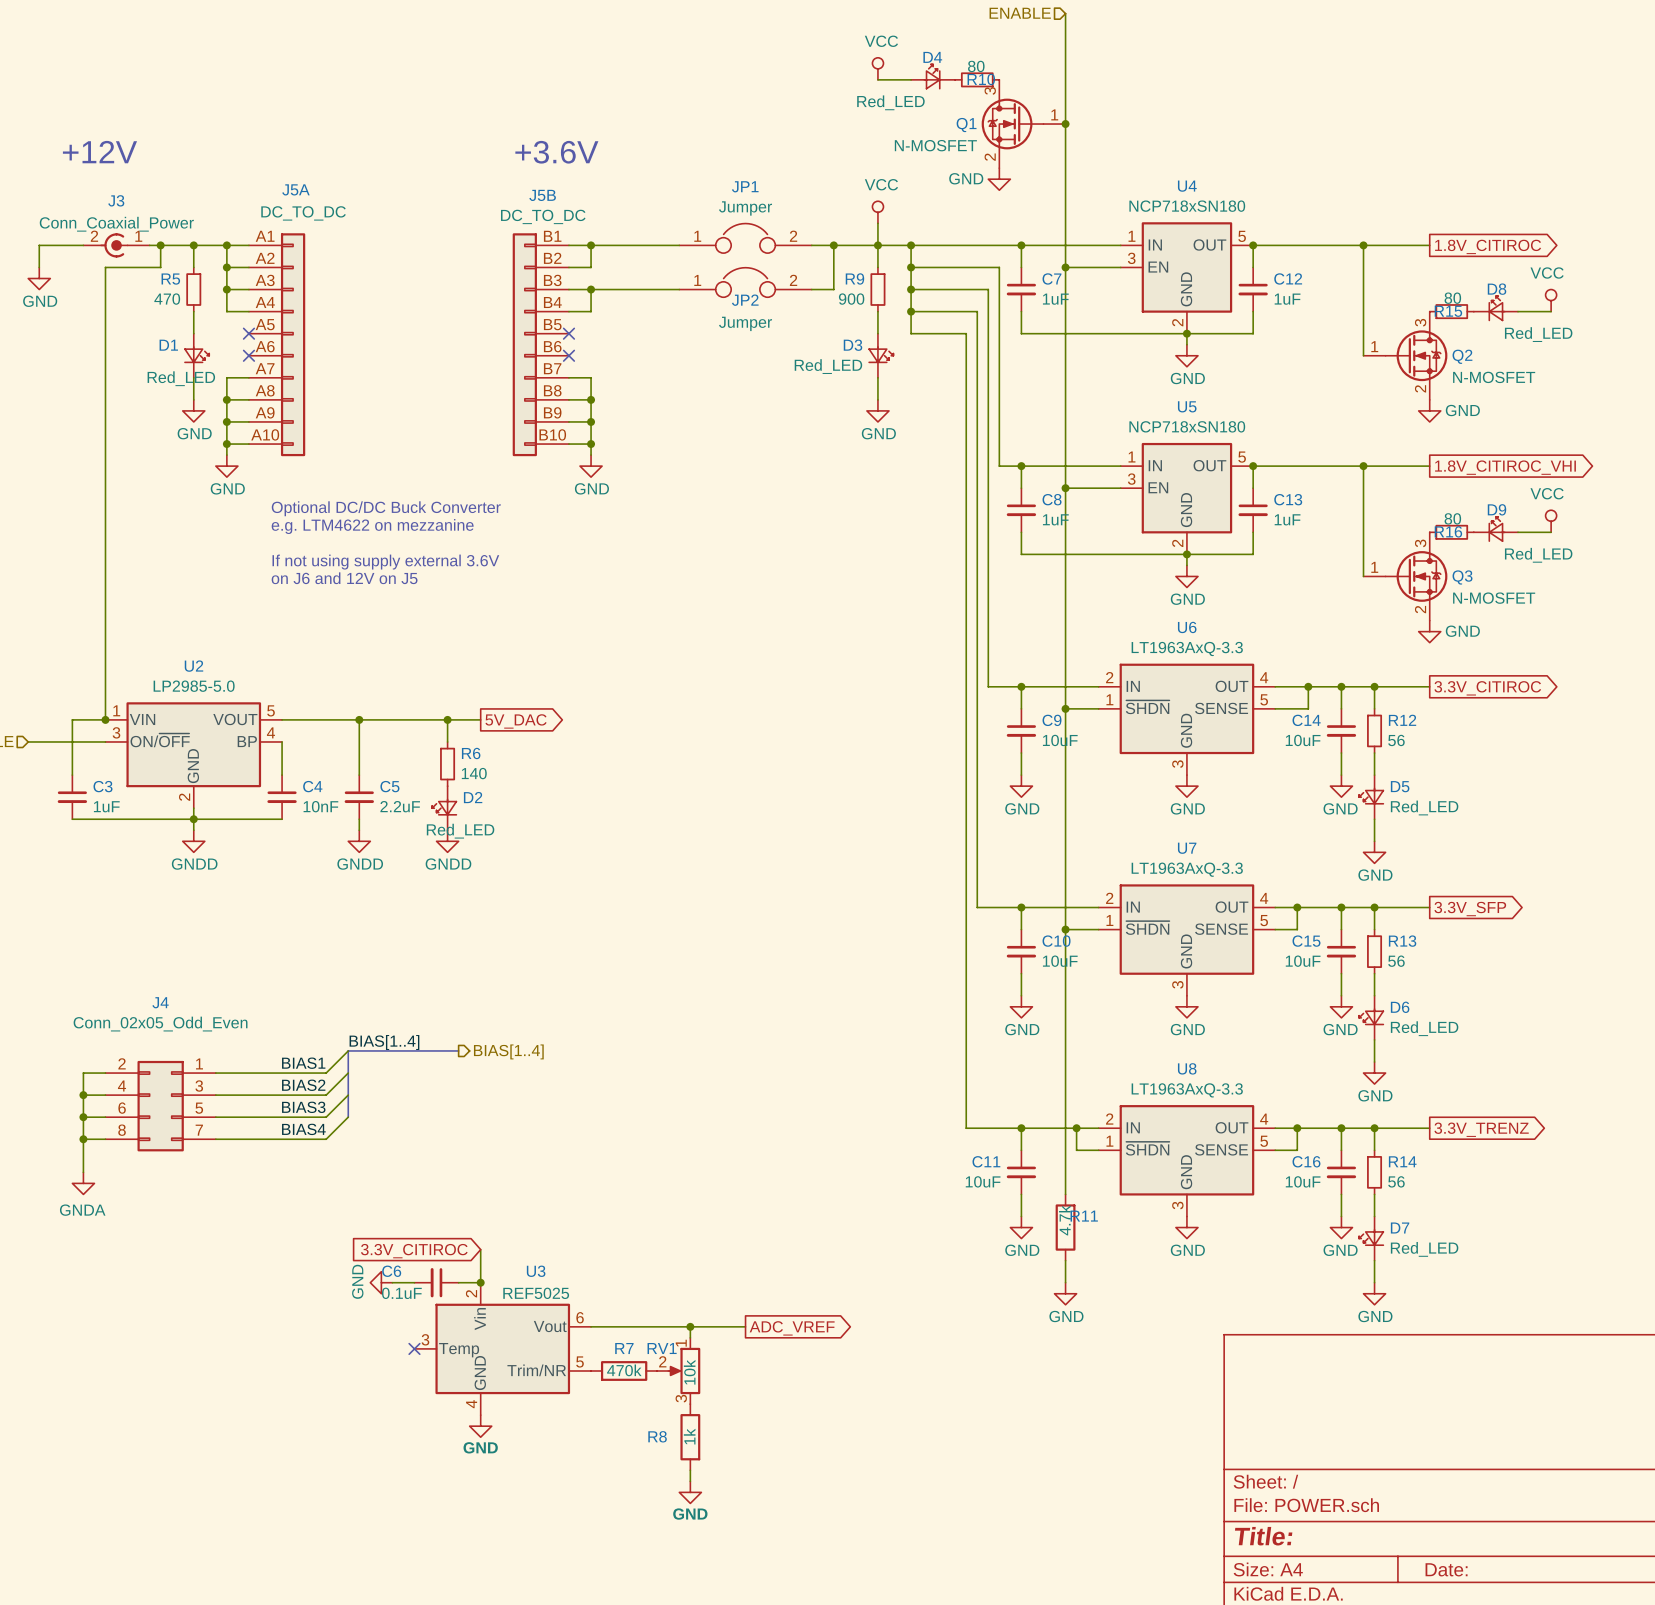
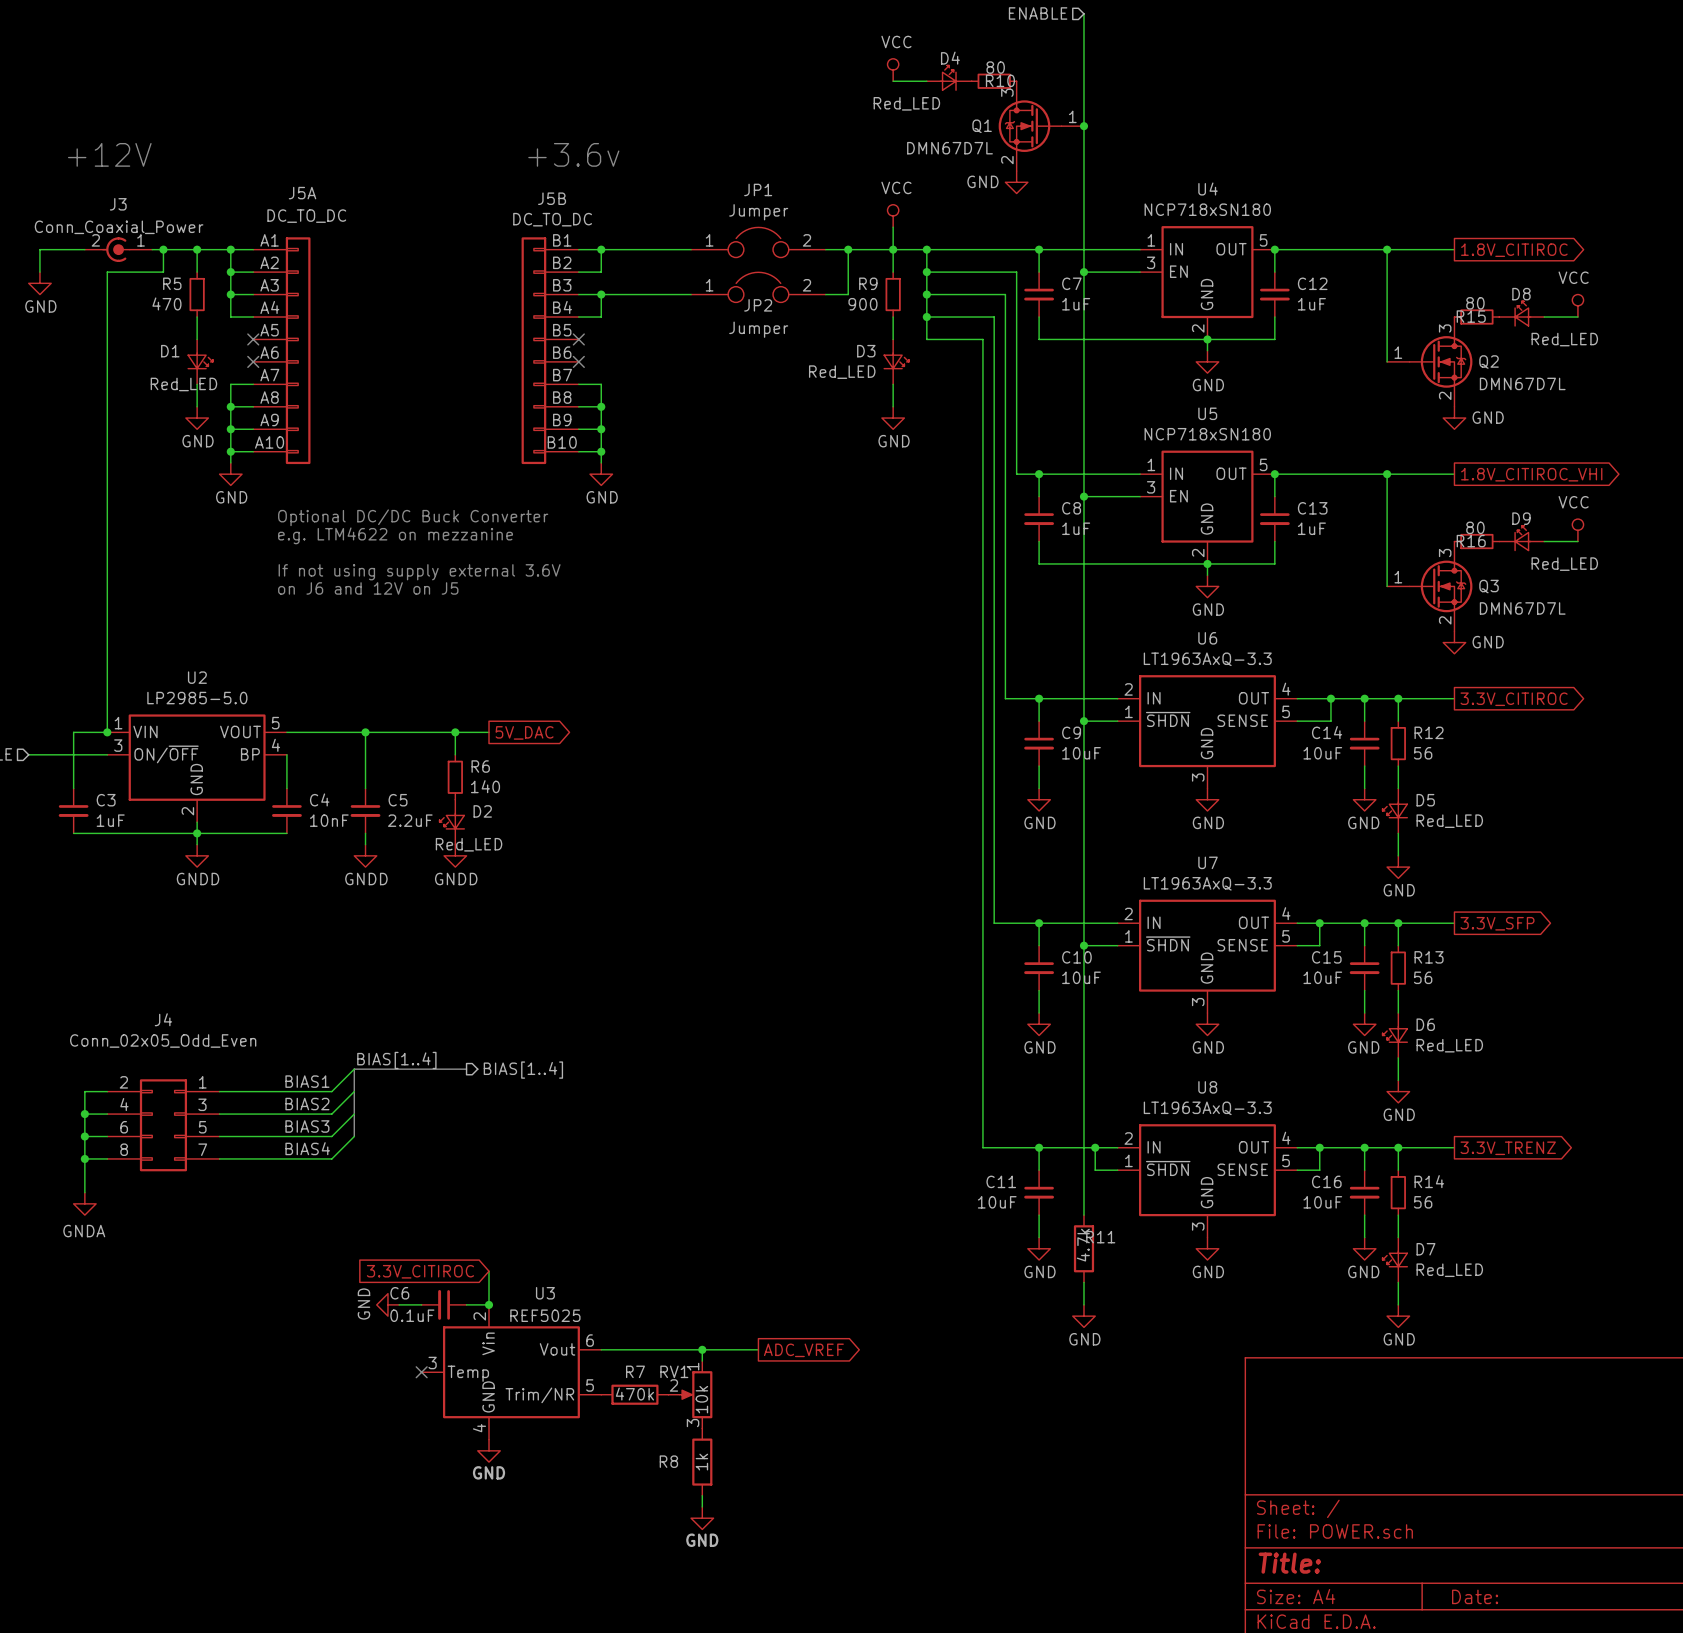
Q1 value: N-MOSFET (935, 145) -> DMN67D7L (950, 148)
text: +3.6V (556, 152) -> +3.6v (573, 154)
Q2 value: N-MOSFET (1494, 377) -> DMN67D7L (1522, 383)
Q3 value: N-MOSFET (1494, 598) -> DMN67D7L (1522, 608)

